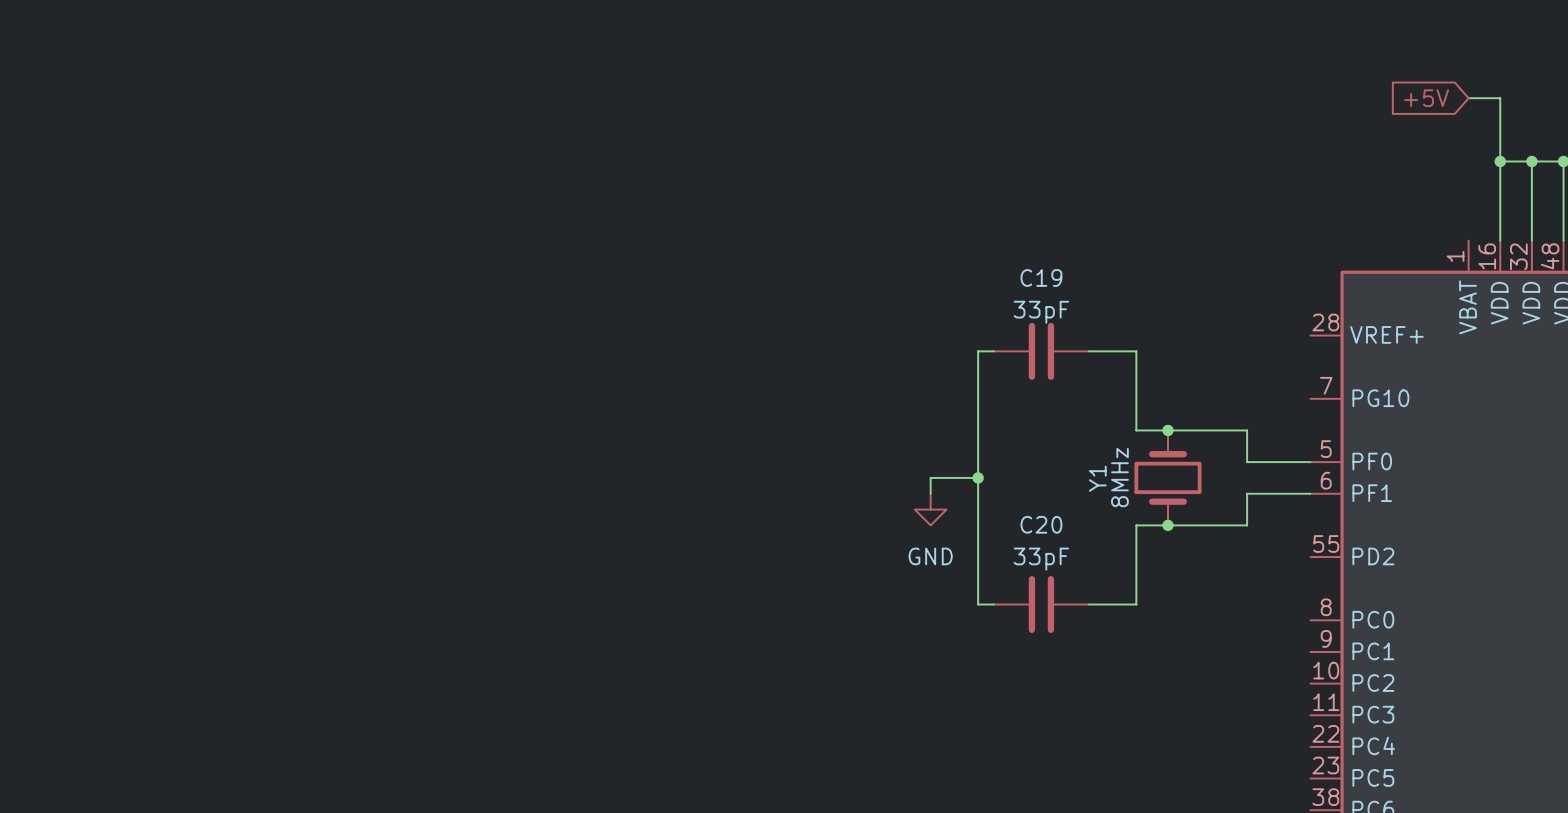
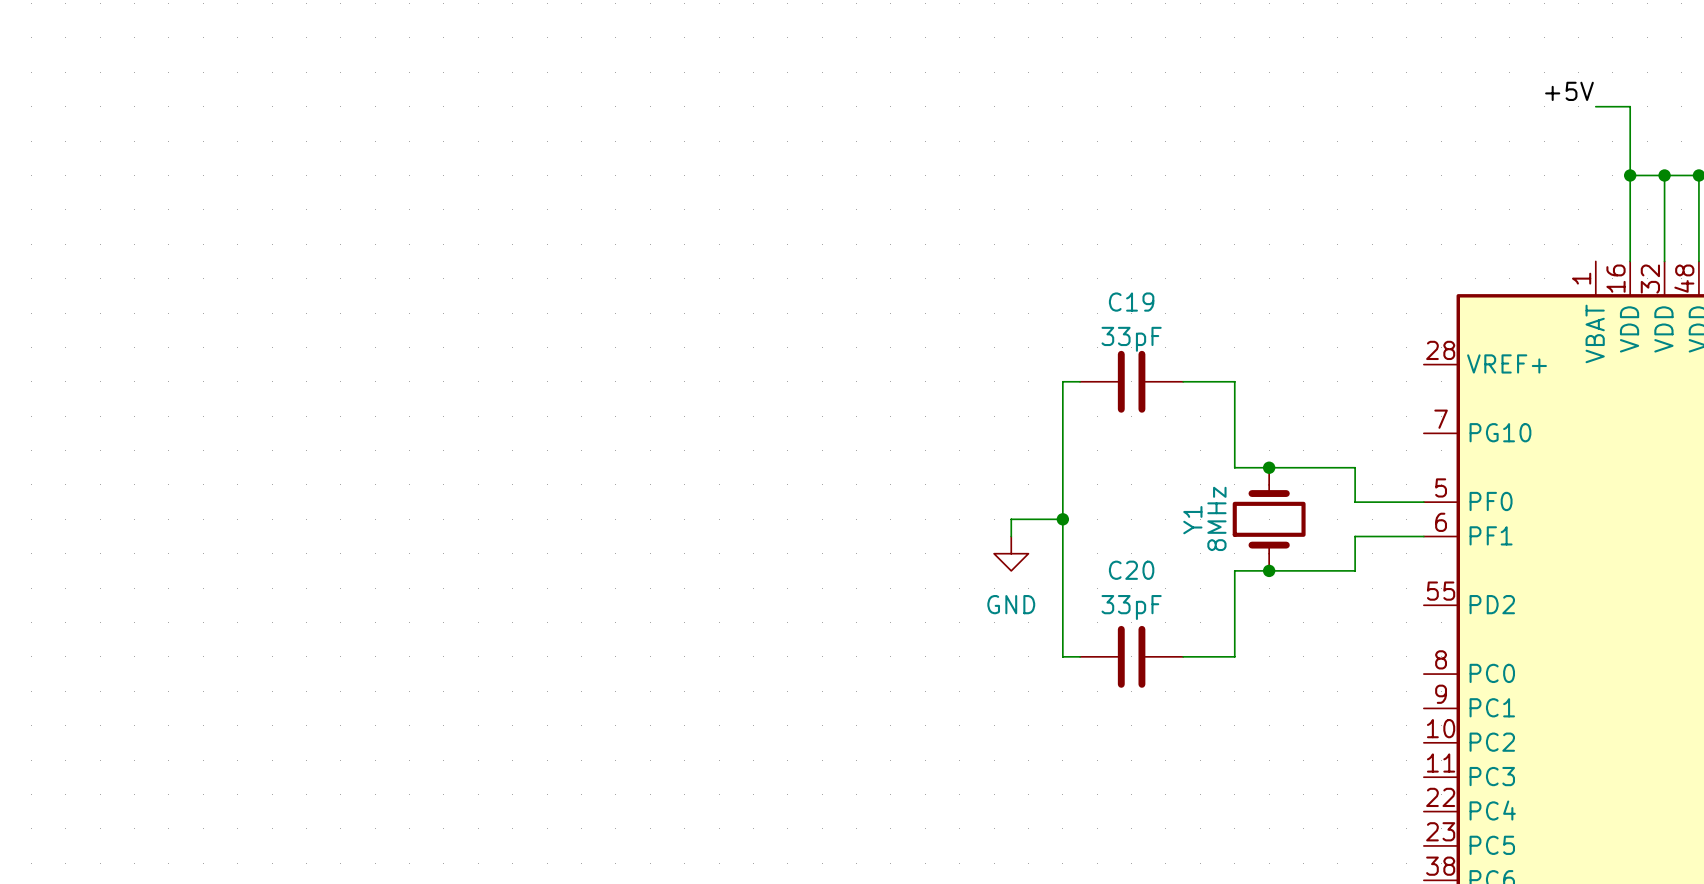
label: none -> +5V (1569, 91)
global label: +5V (1426, 98) -> none

